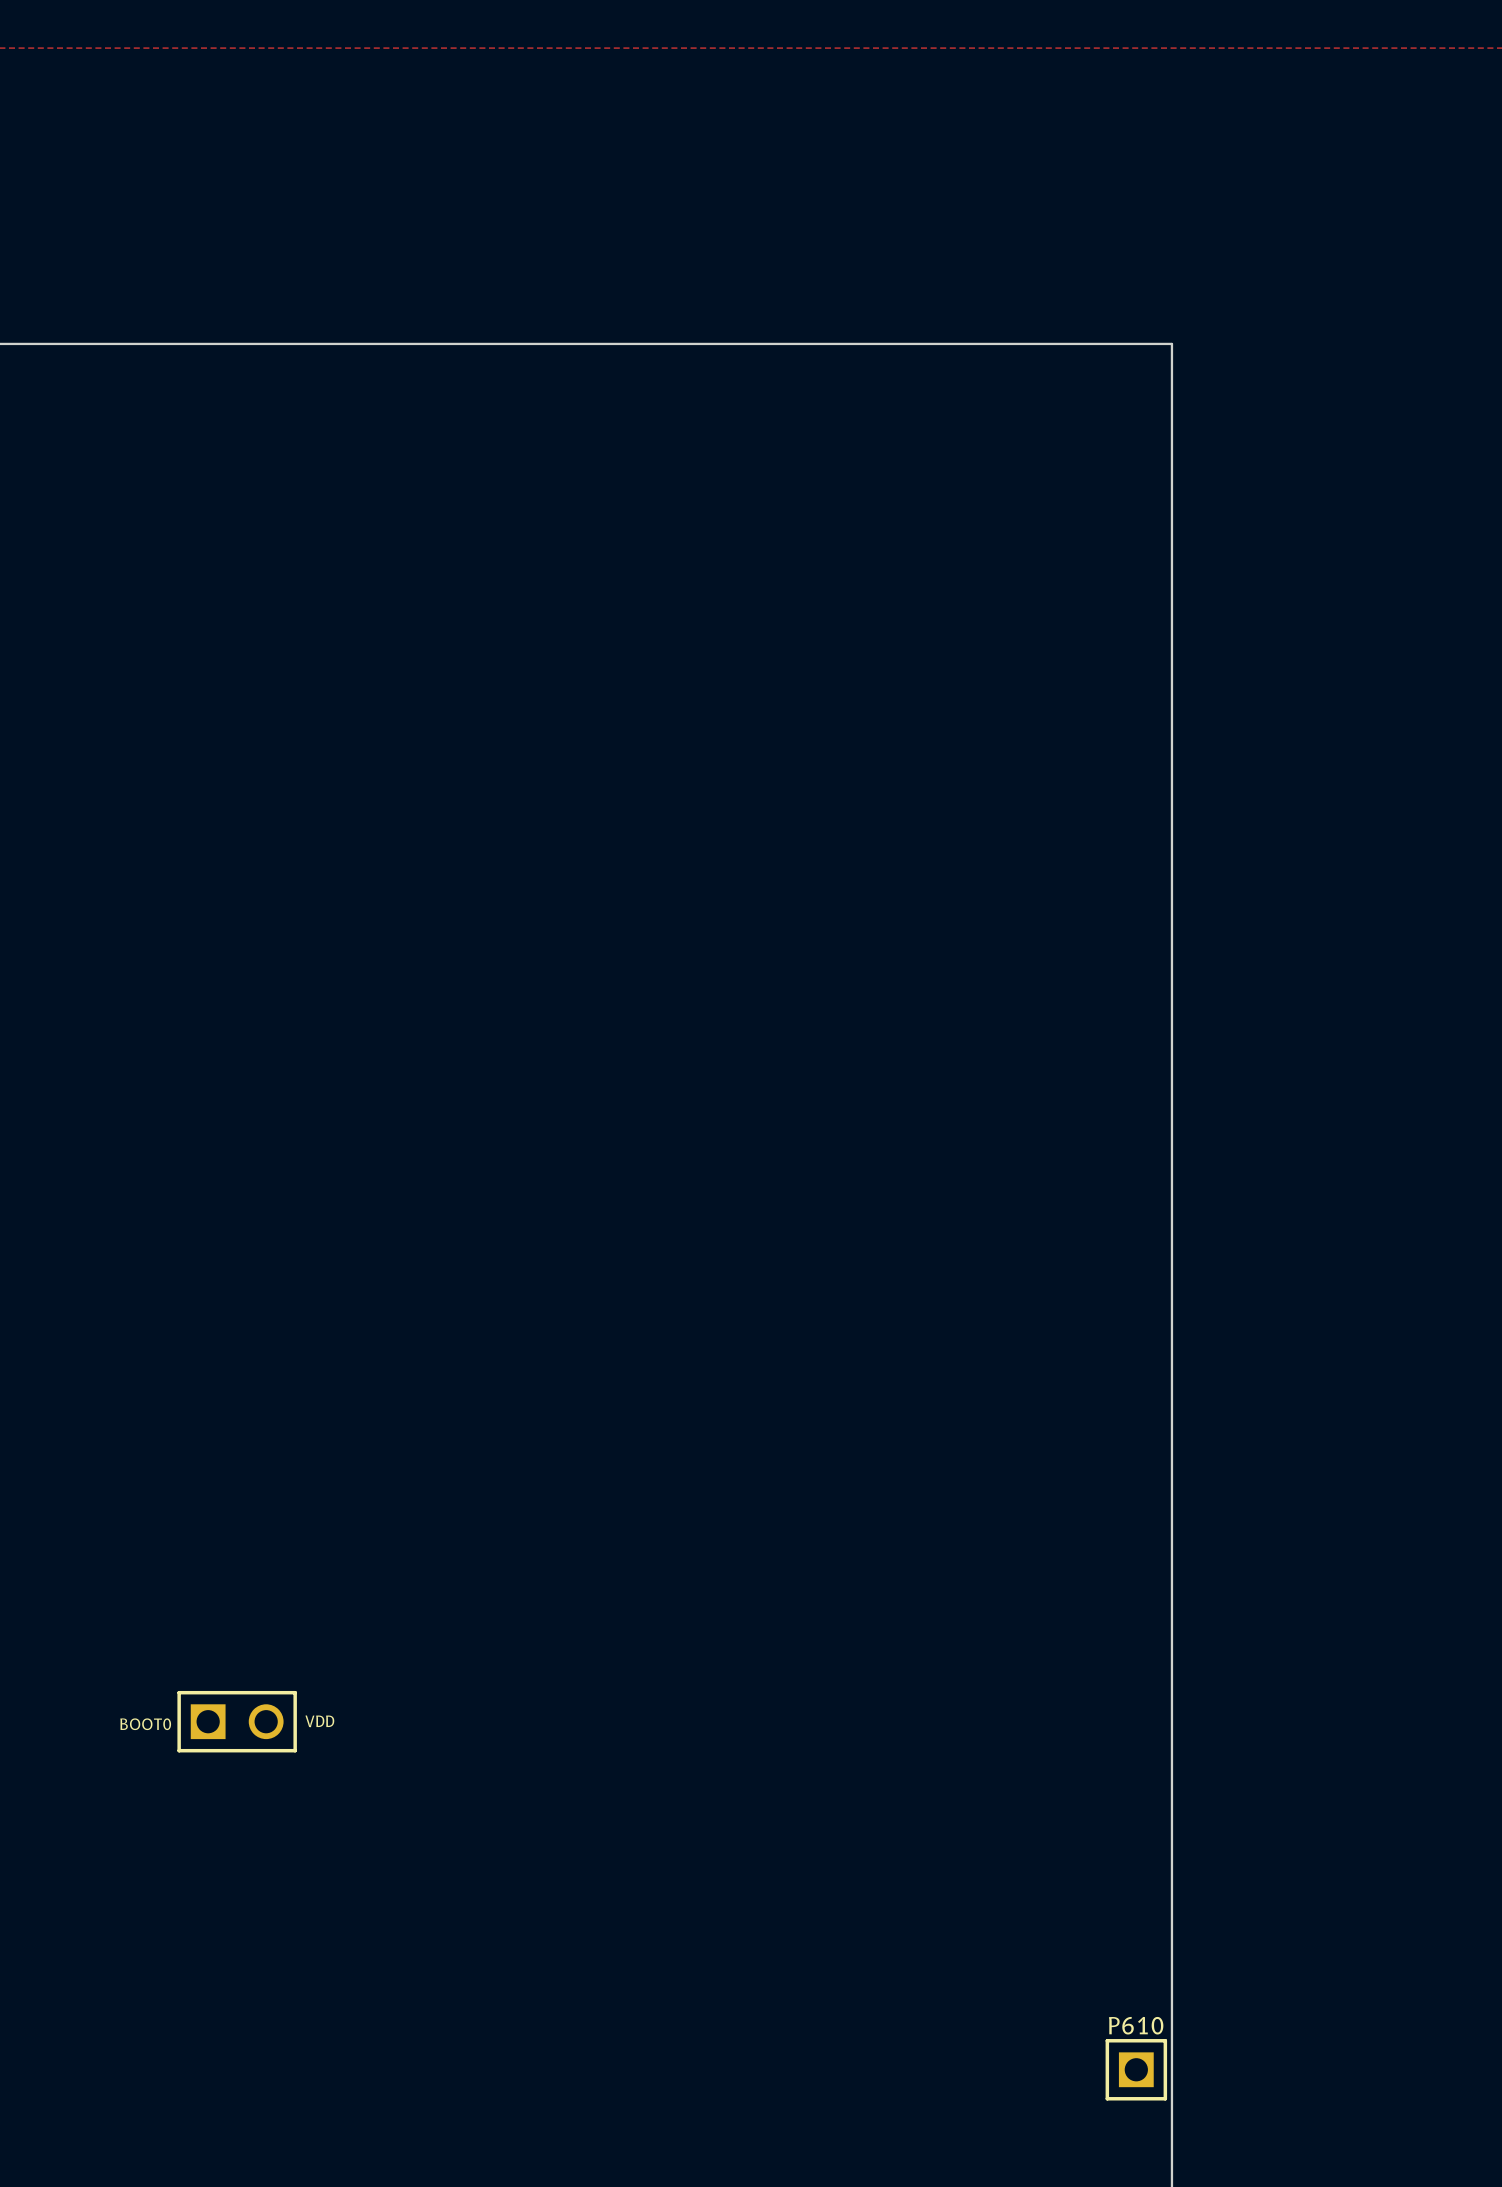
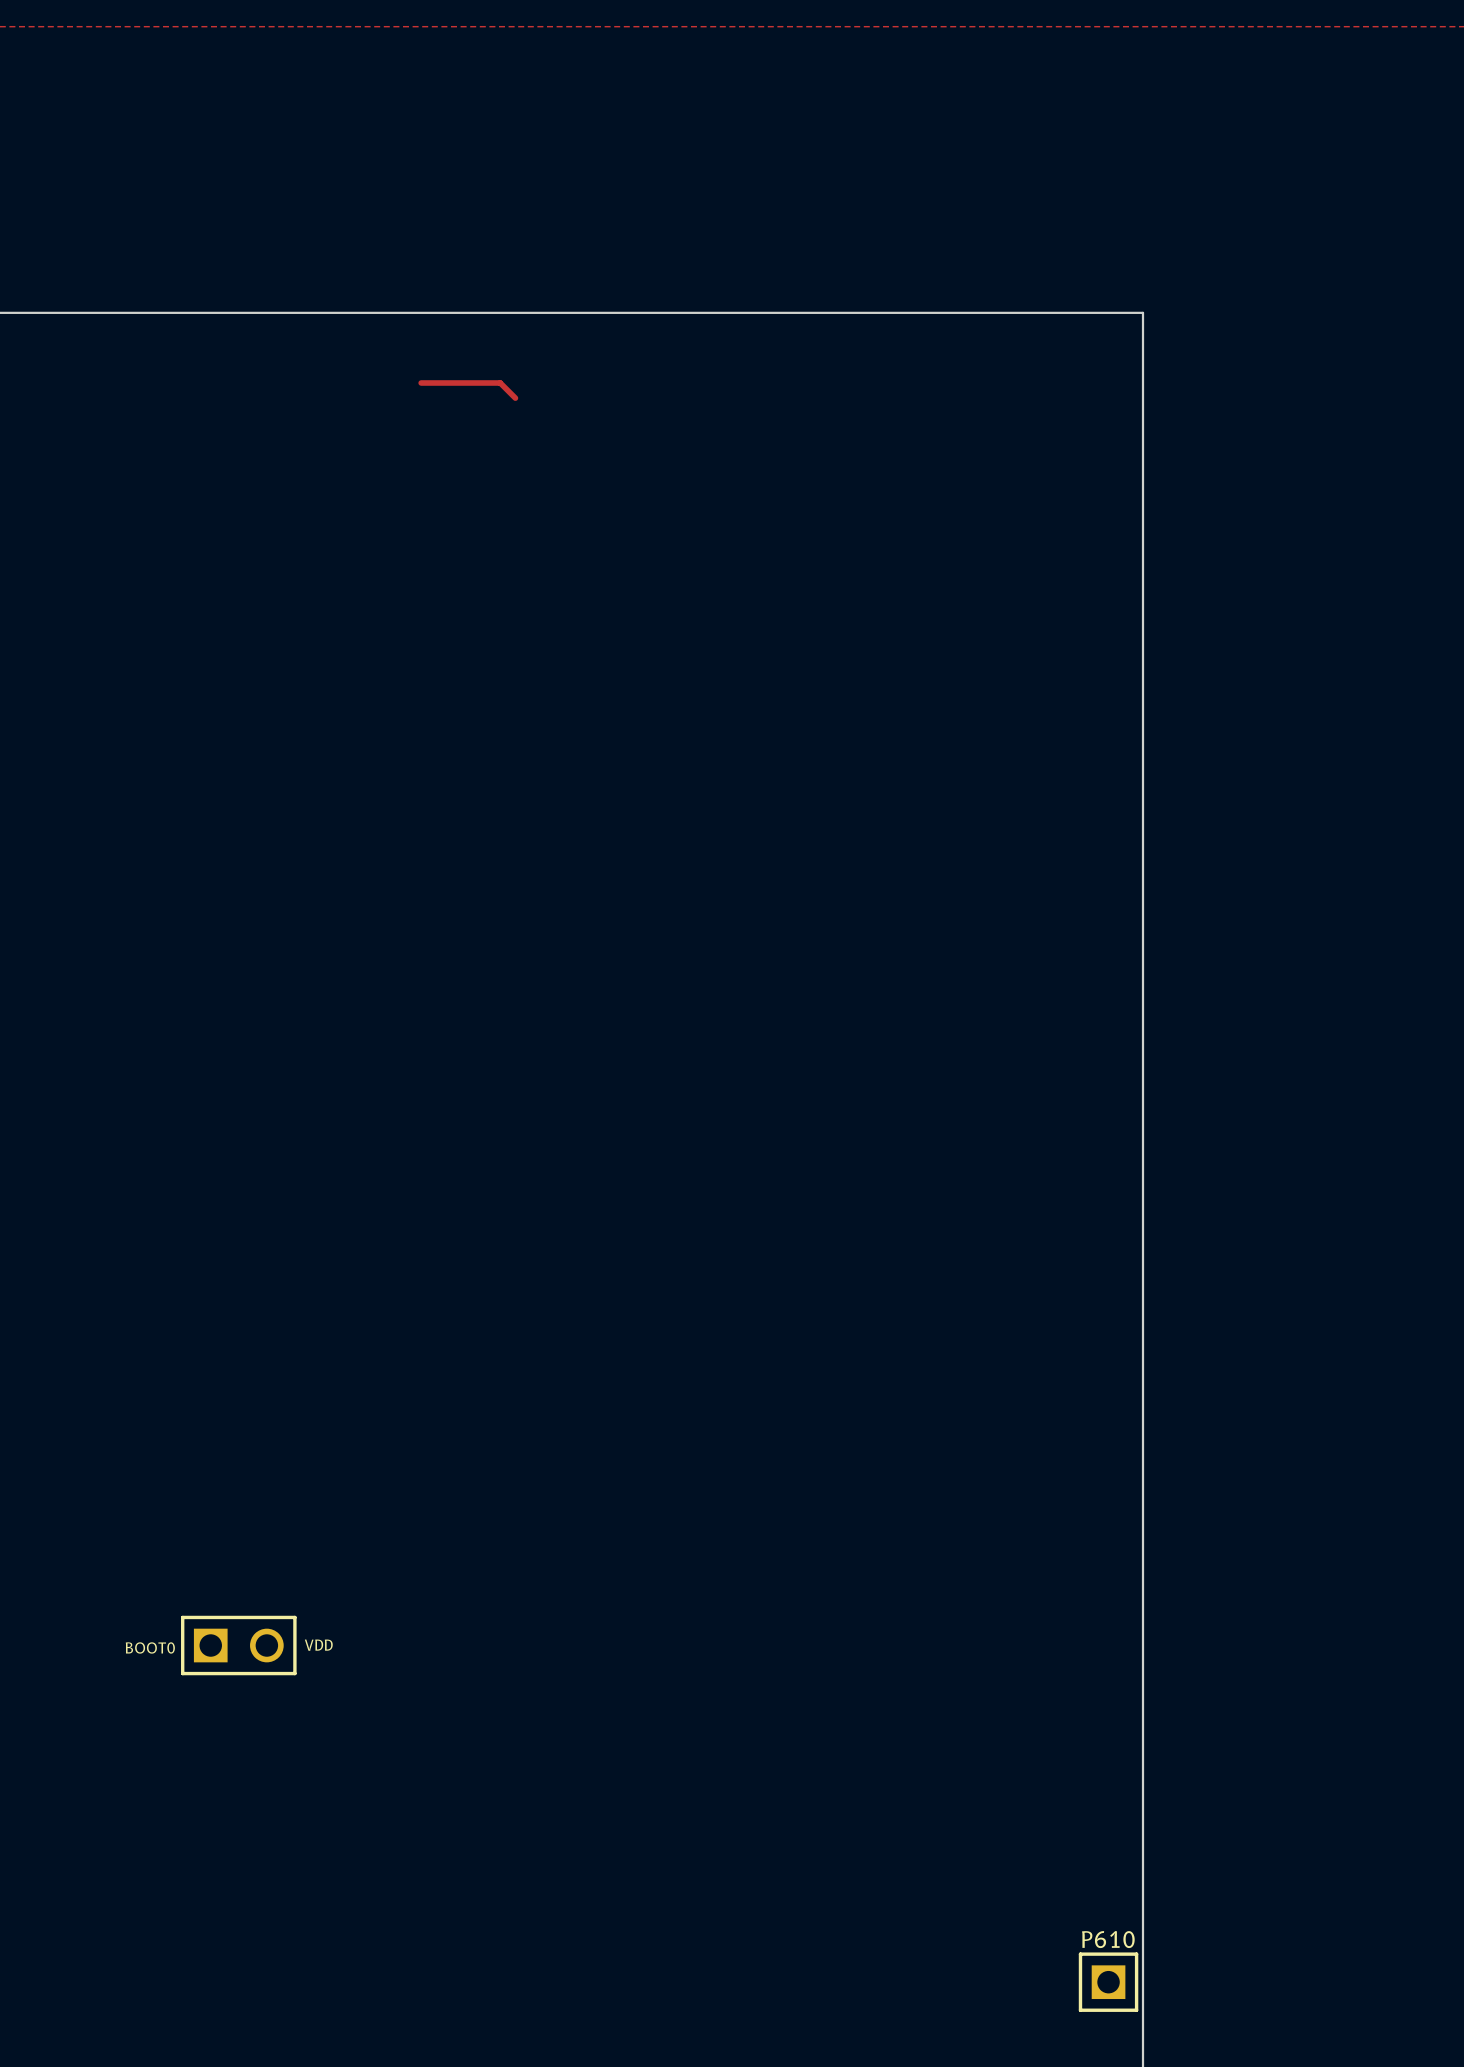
track: none -> (421, 382) (500, 382) (515, 398)

